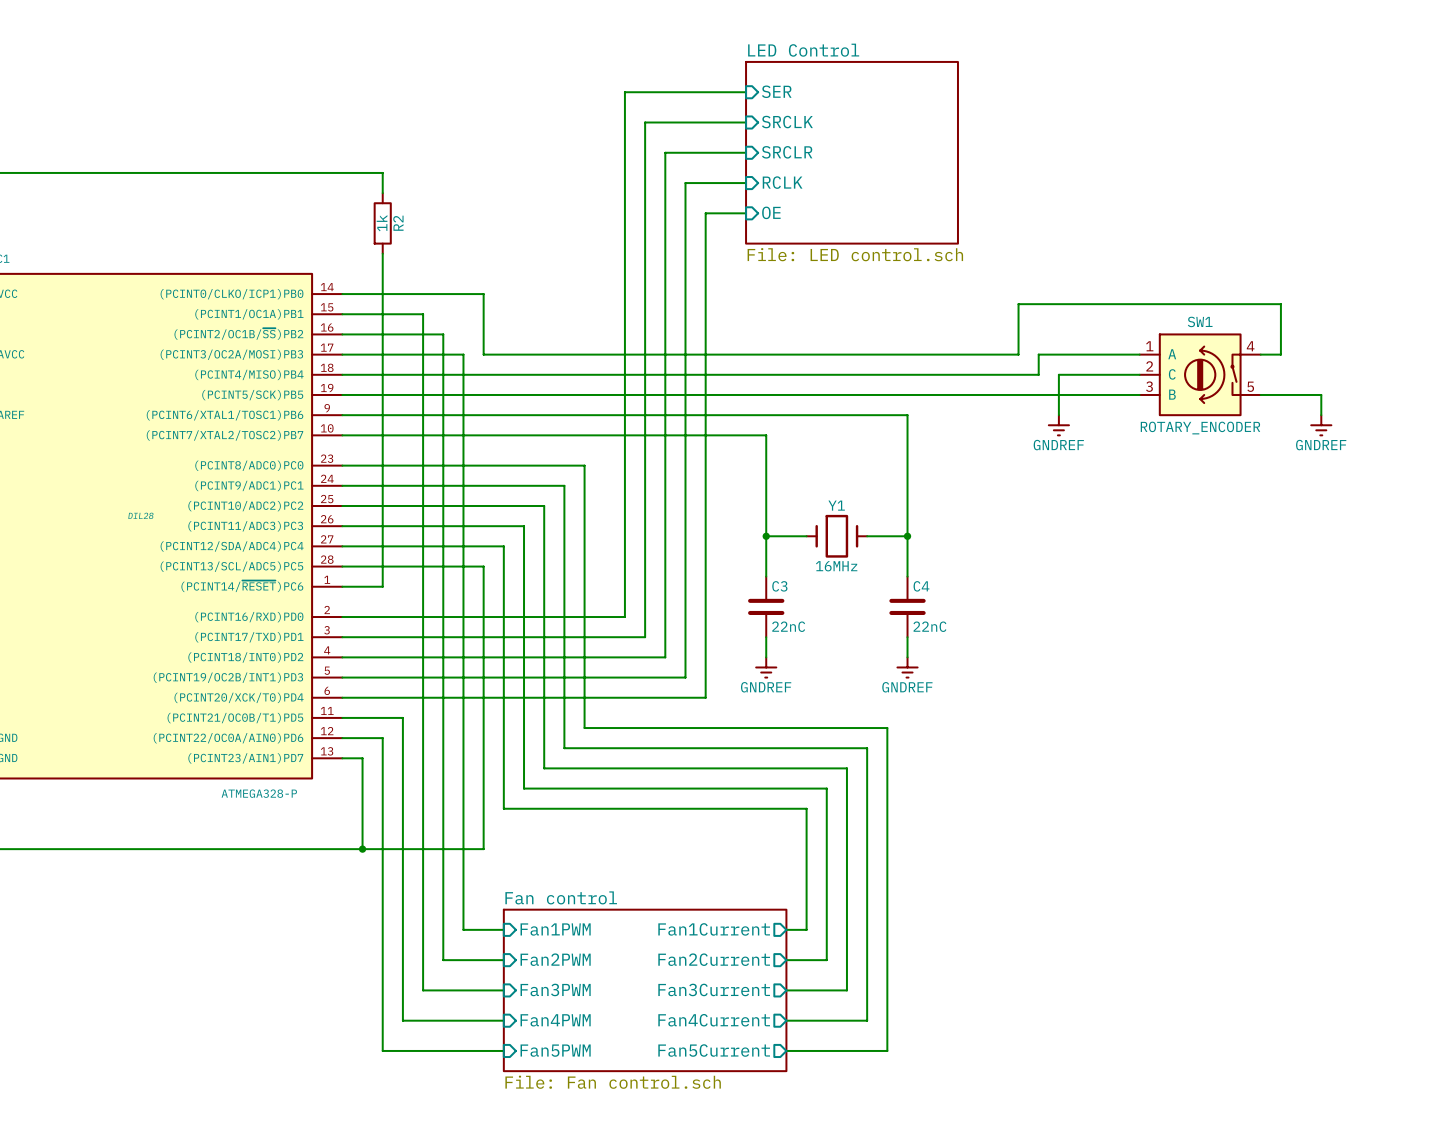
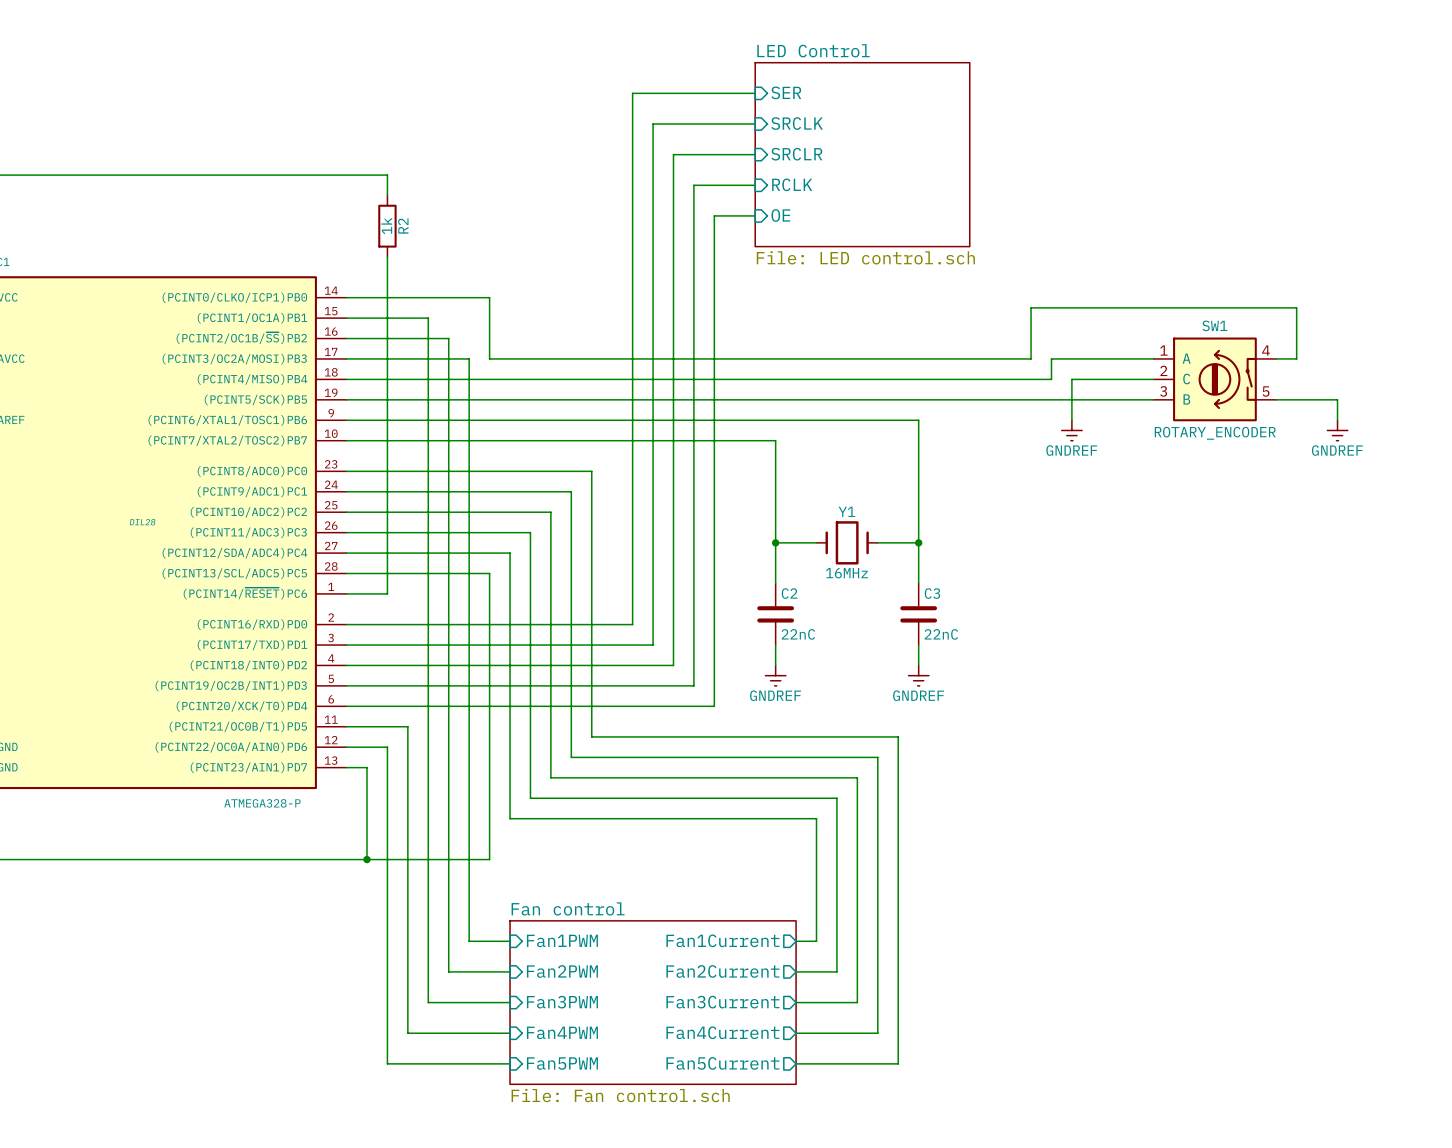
C3 name: C3 (779, 586) -> C2 (789, 593)
C4 name: C4 (921, 586) -> C3 (932, 593)

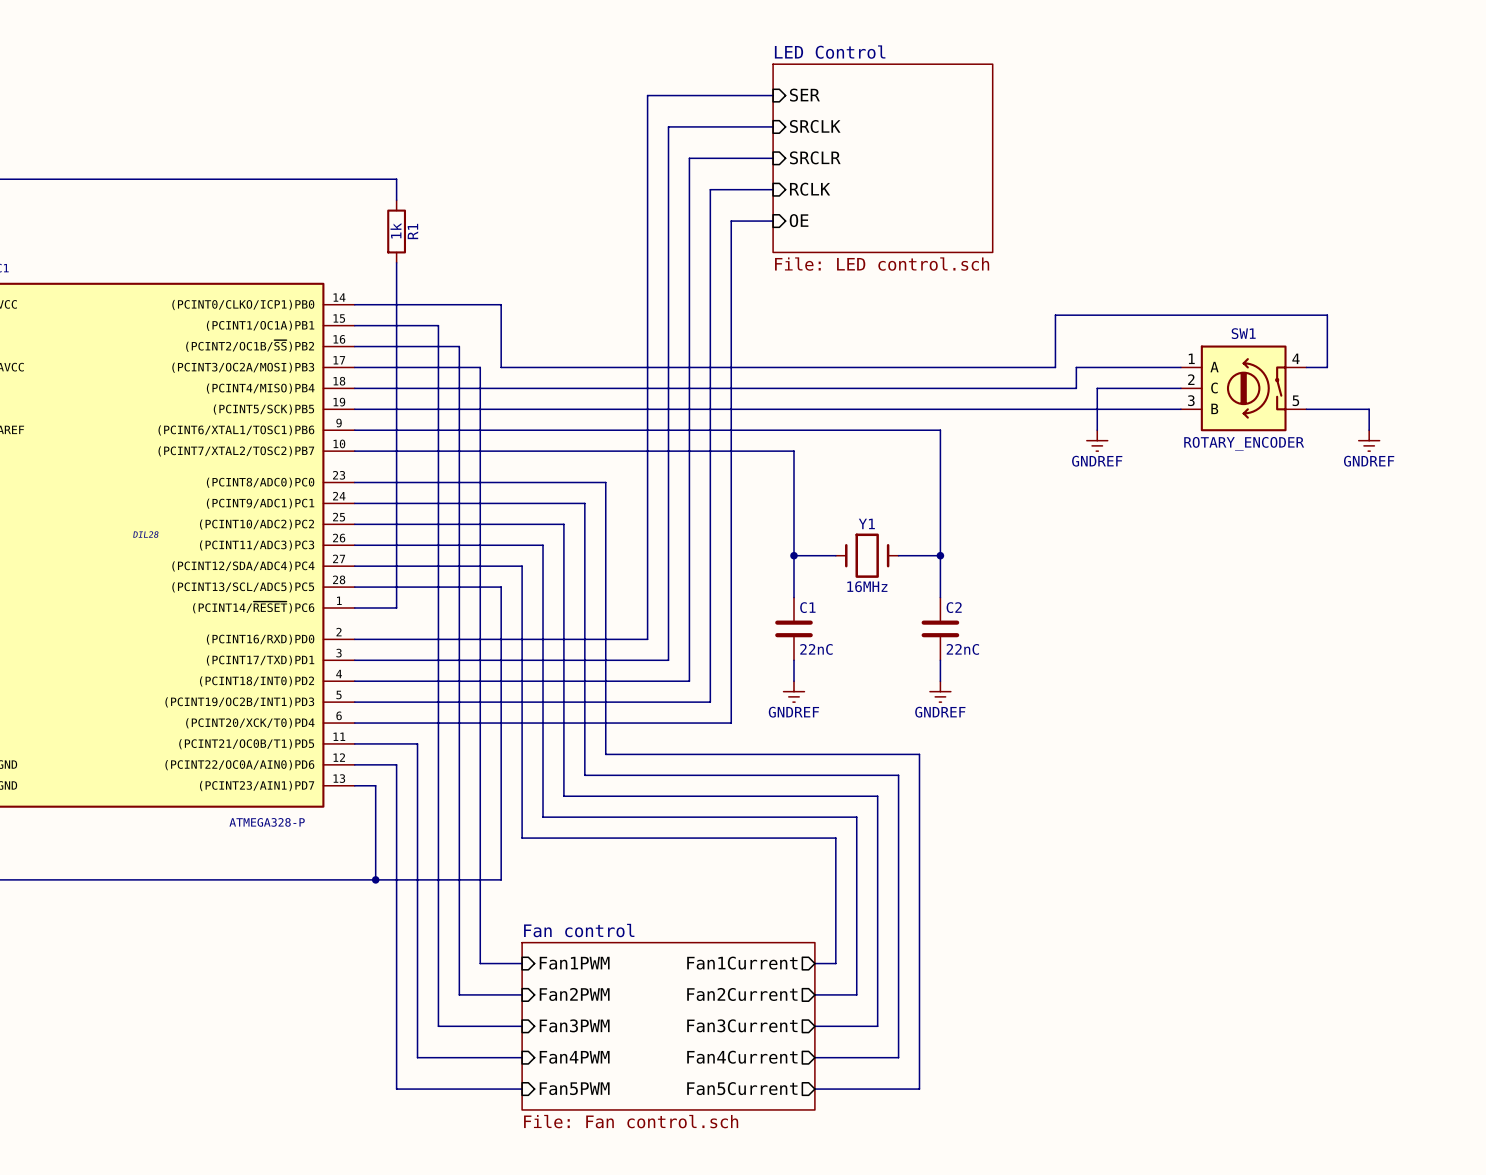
R2 name: R2 (403, 225) -> R1 (412, 231)
C2 name: C2 (789, 593) -> C1 (807, 607)
C3 name: C3 (932, 593) -> C2 (954, 607)

